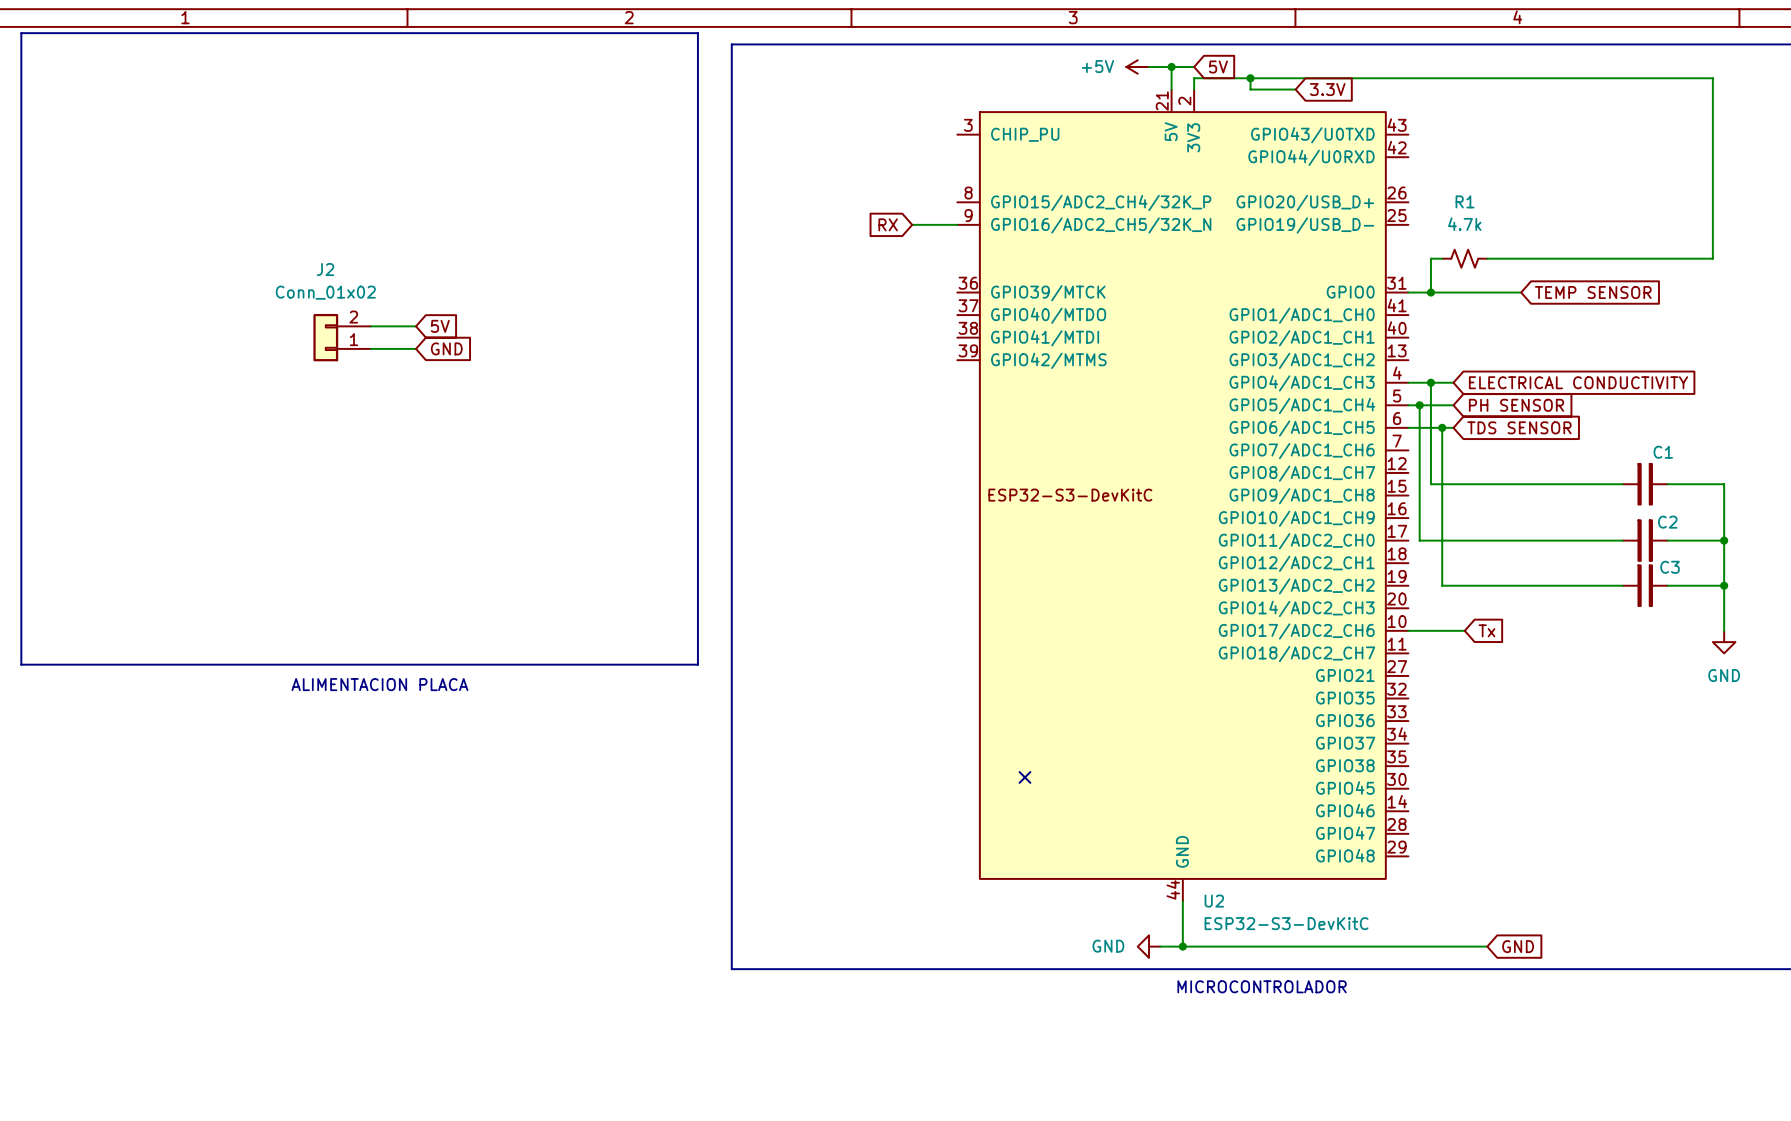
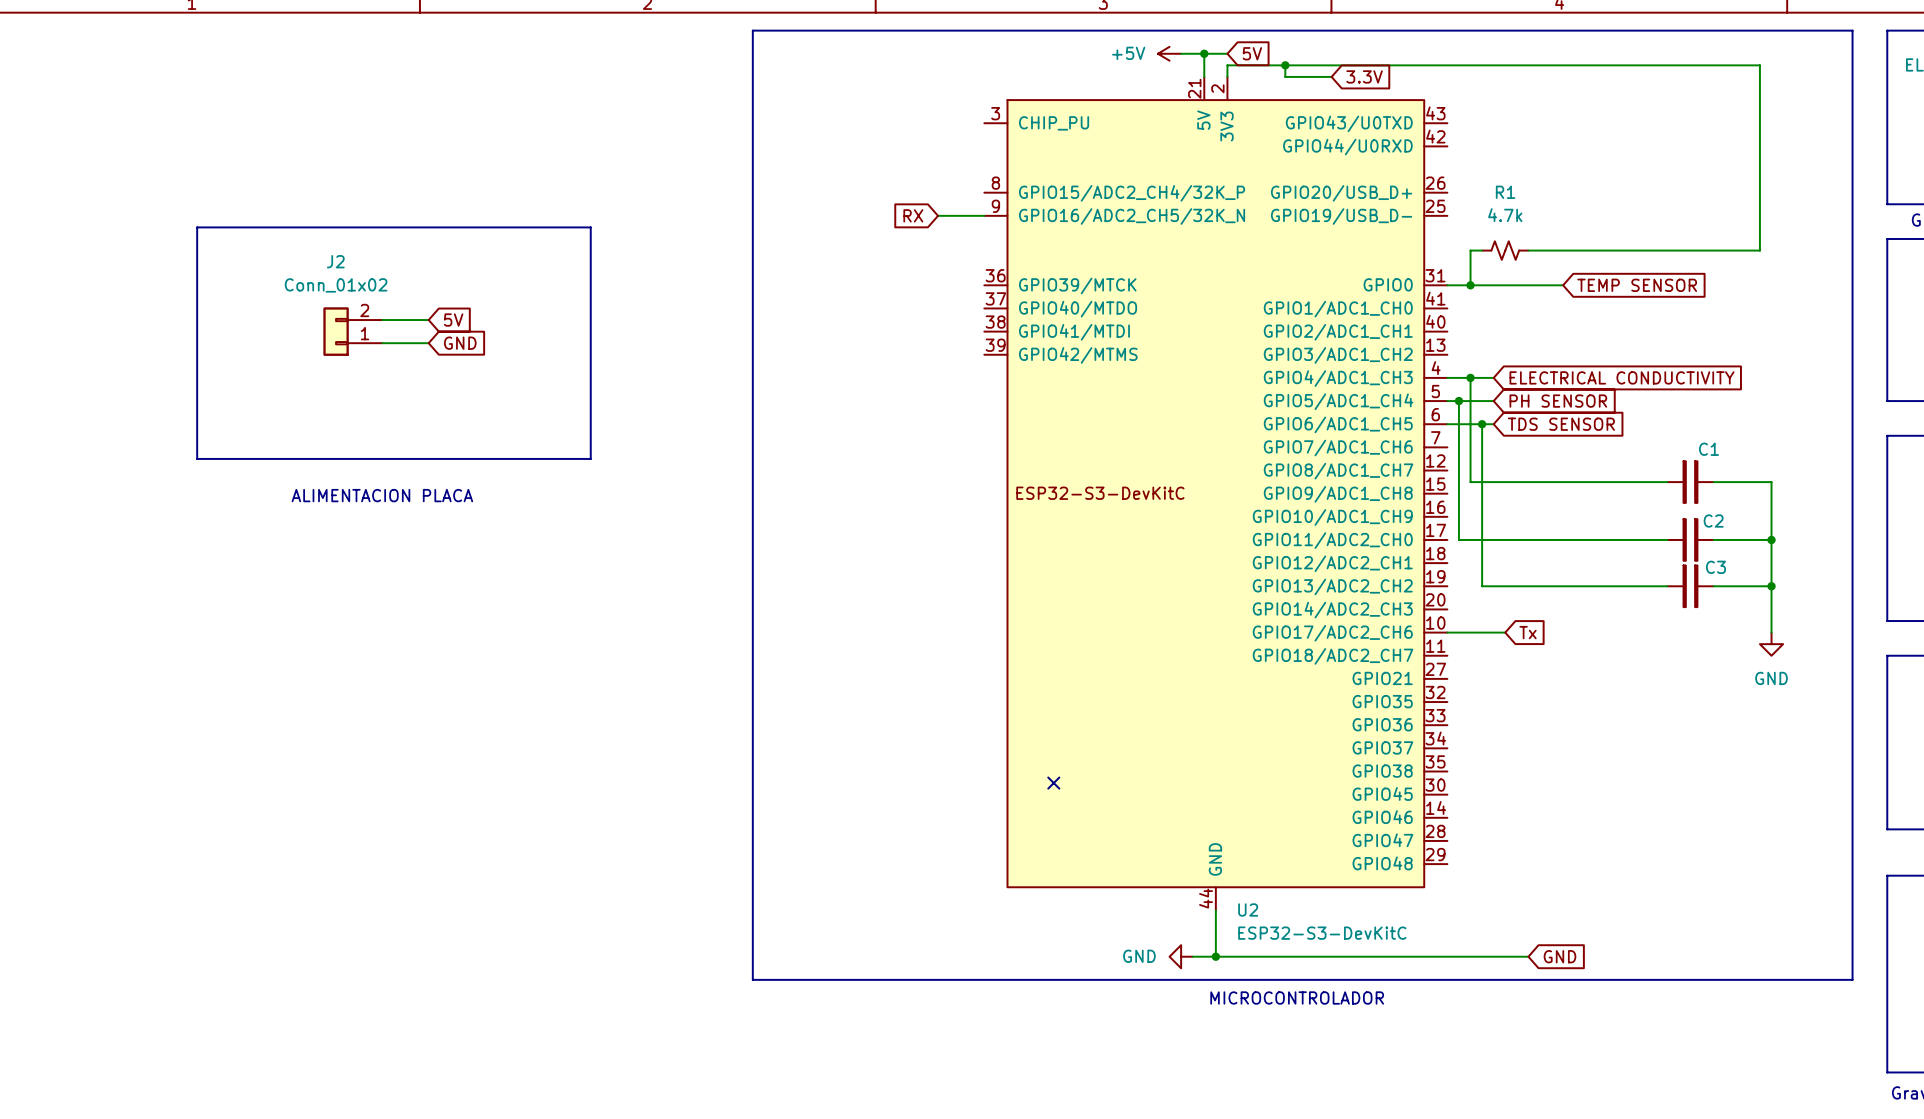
line: (21, 33) (697, 33) (697, 664) (21, 664) (21, 33) -> none
line: none -> (197, 227) (590, 227) (590, 458) (197, 458) (197, 227)
text position: ALIMENTACION PLACA (379, 684) -> ALIMENTACION PLACA (382, 495)

